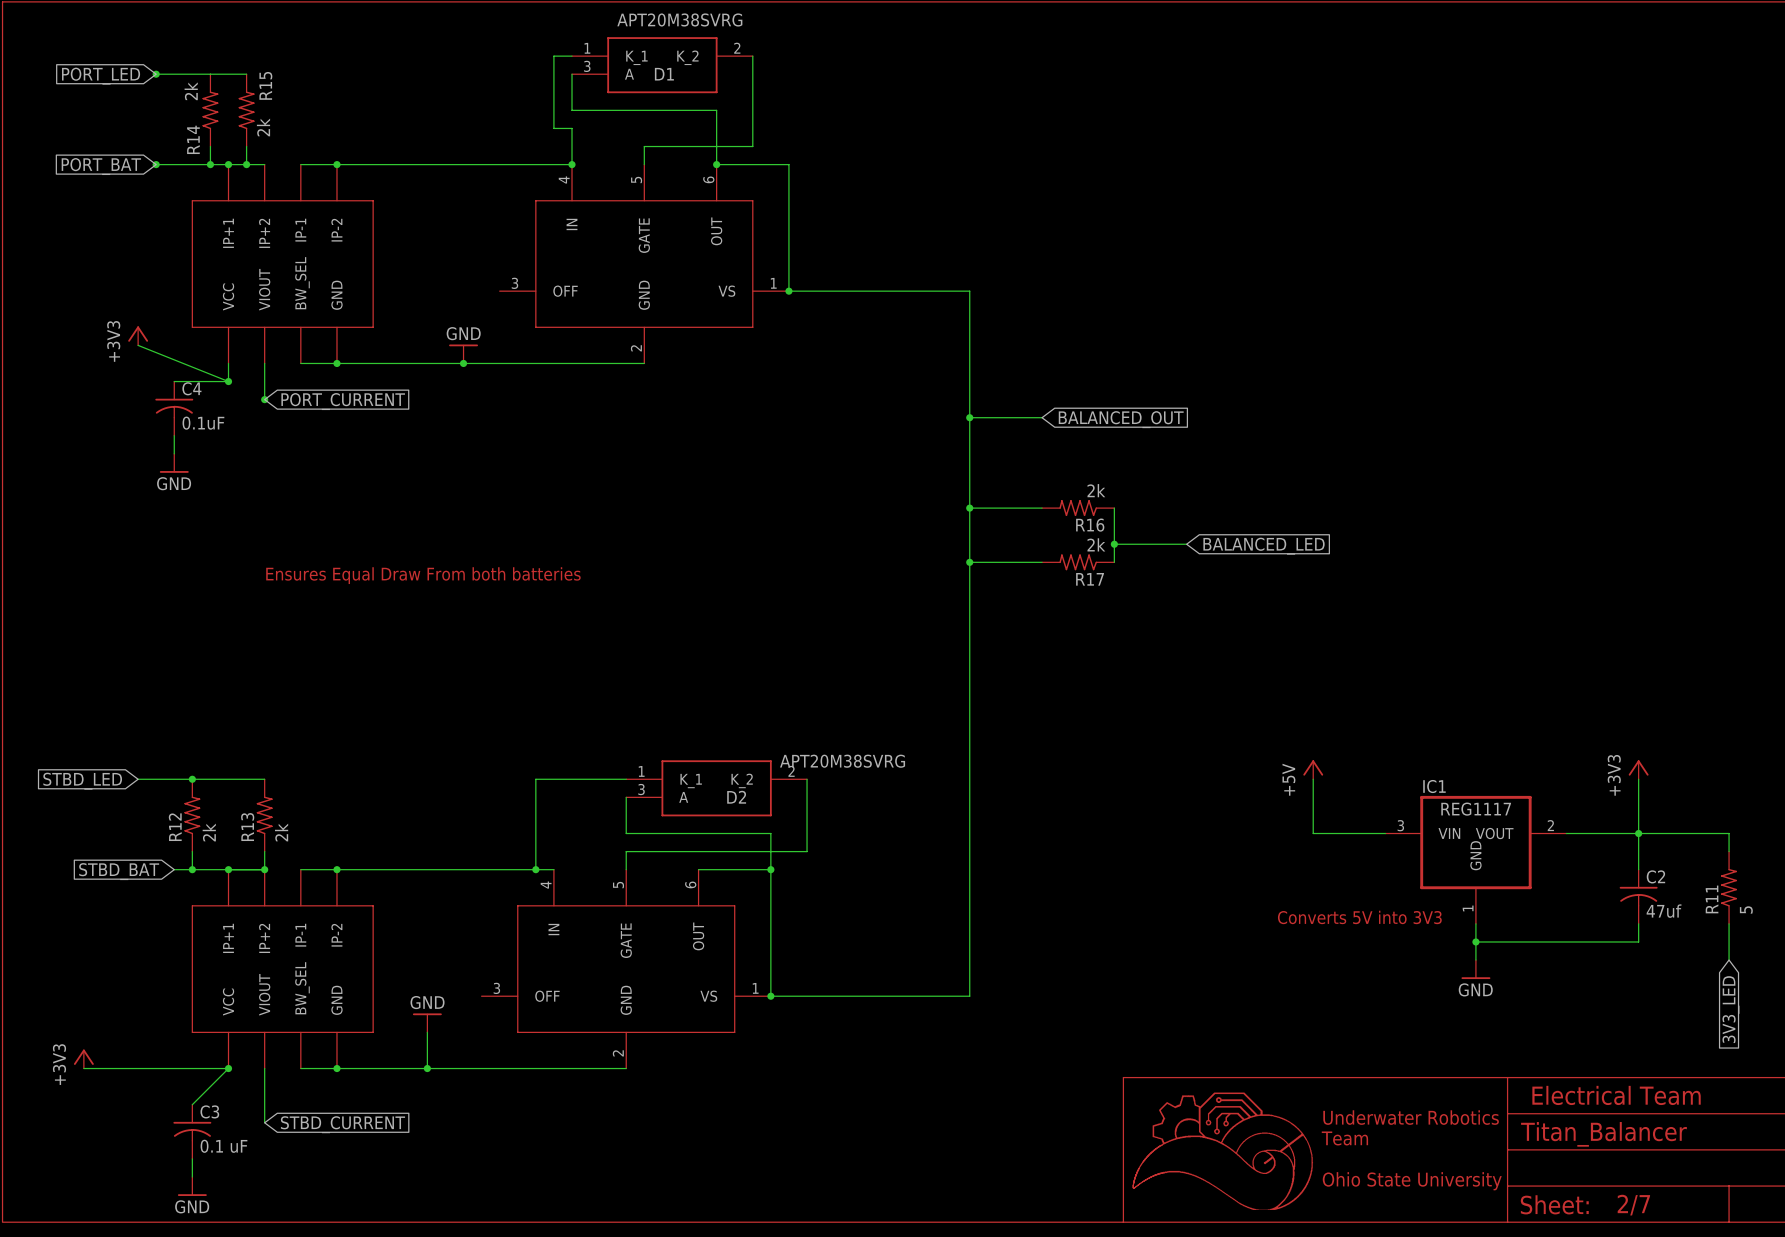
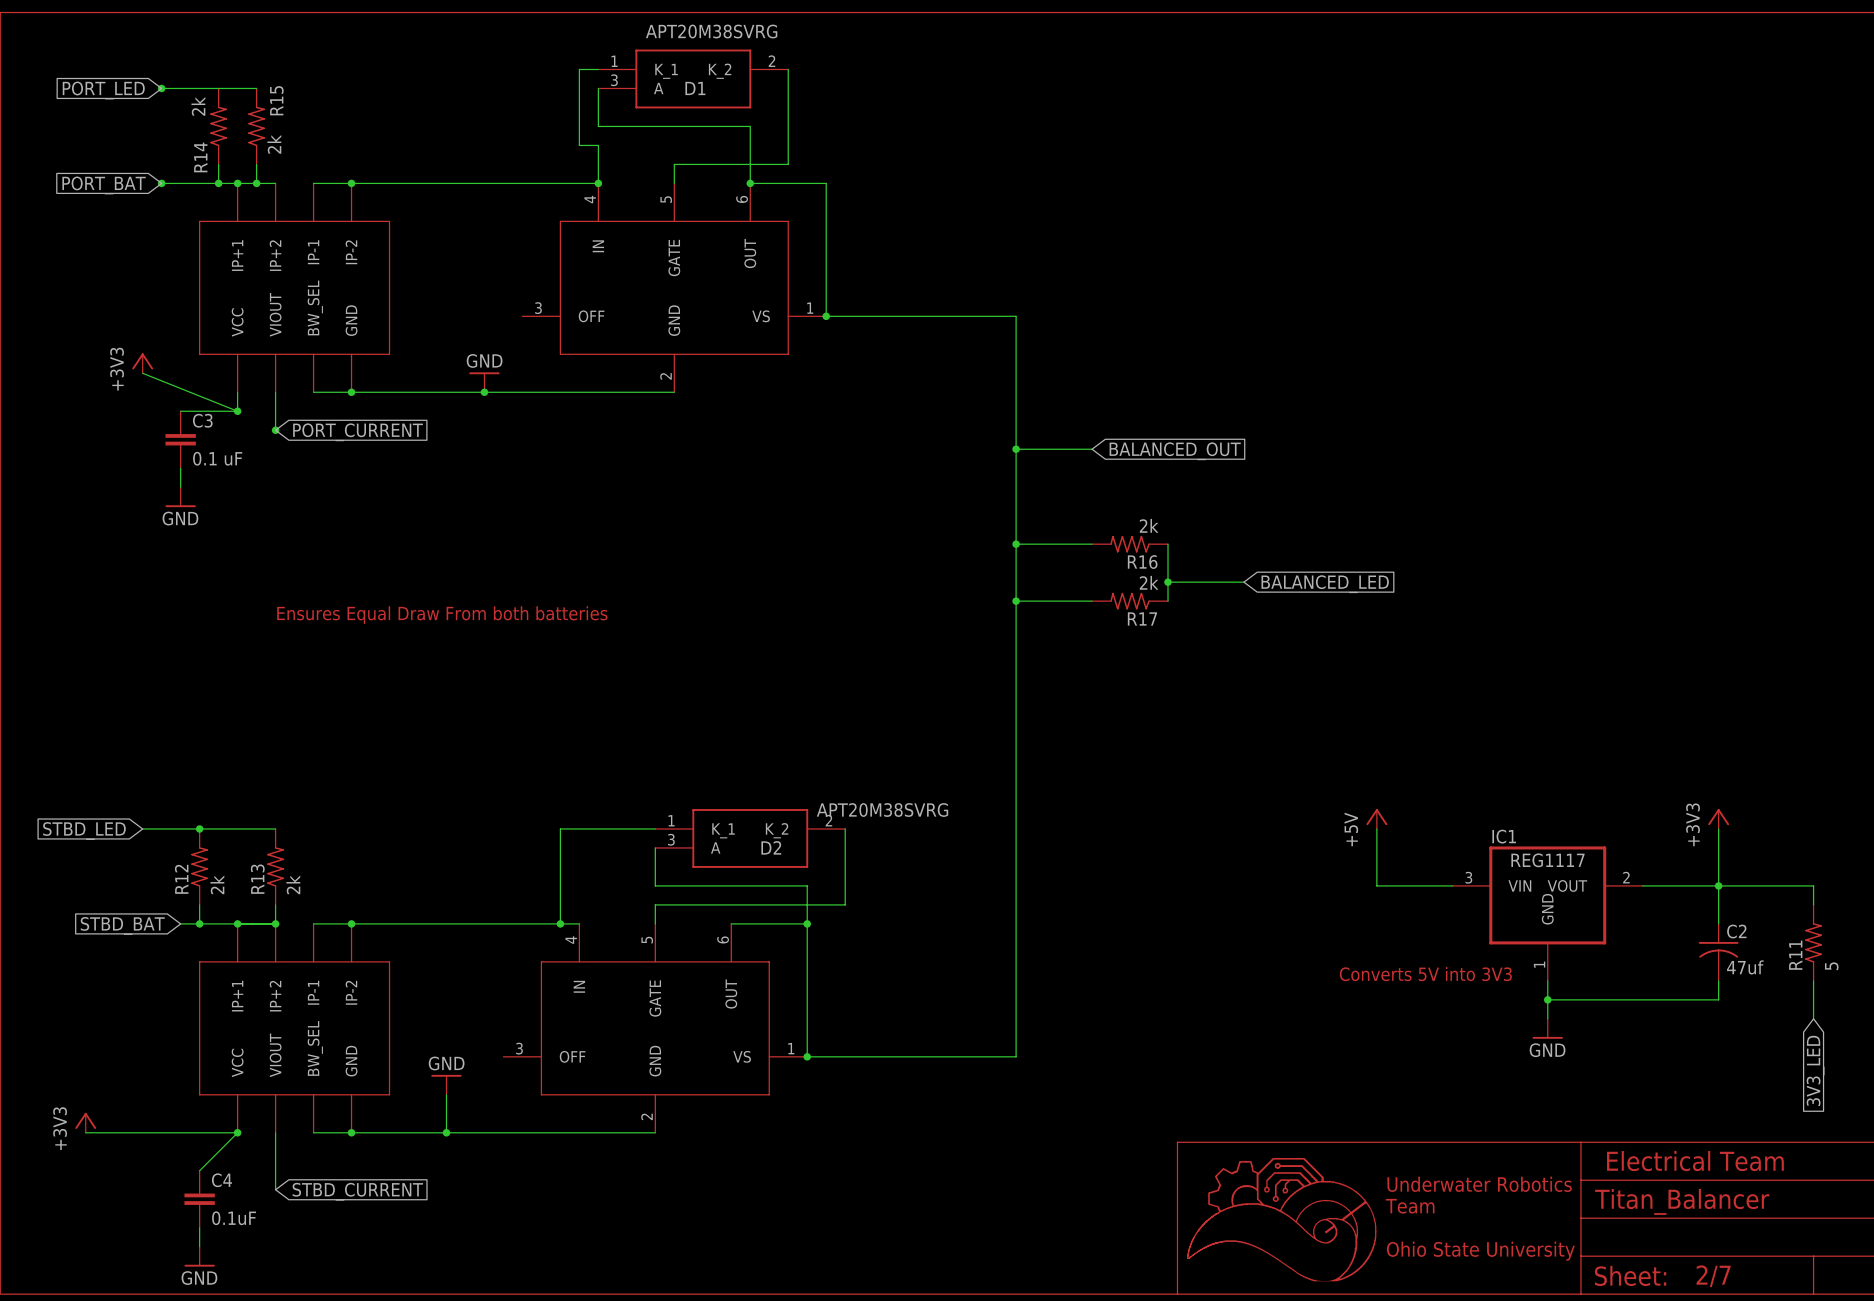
C4 symbol: [155, 381, 194, 436] -> [184, 1170, 215, 1228]
C3 symbol: [173, 1104, 212, 1159] -> [165, 411, 196, 469]

